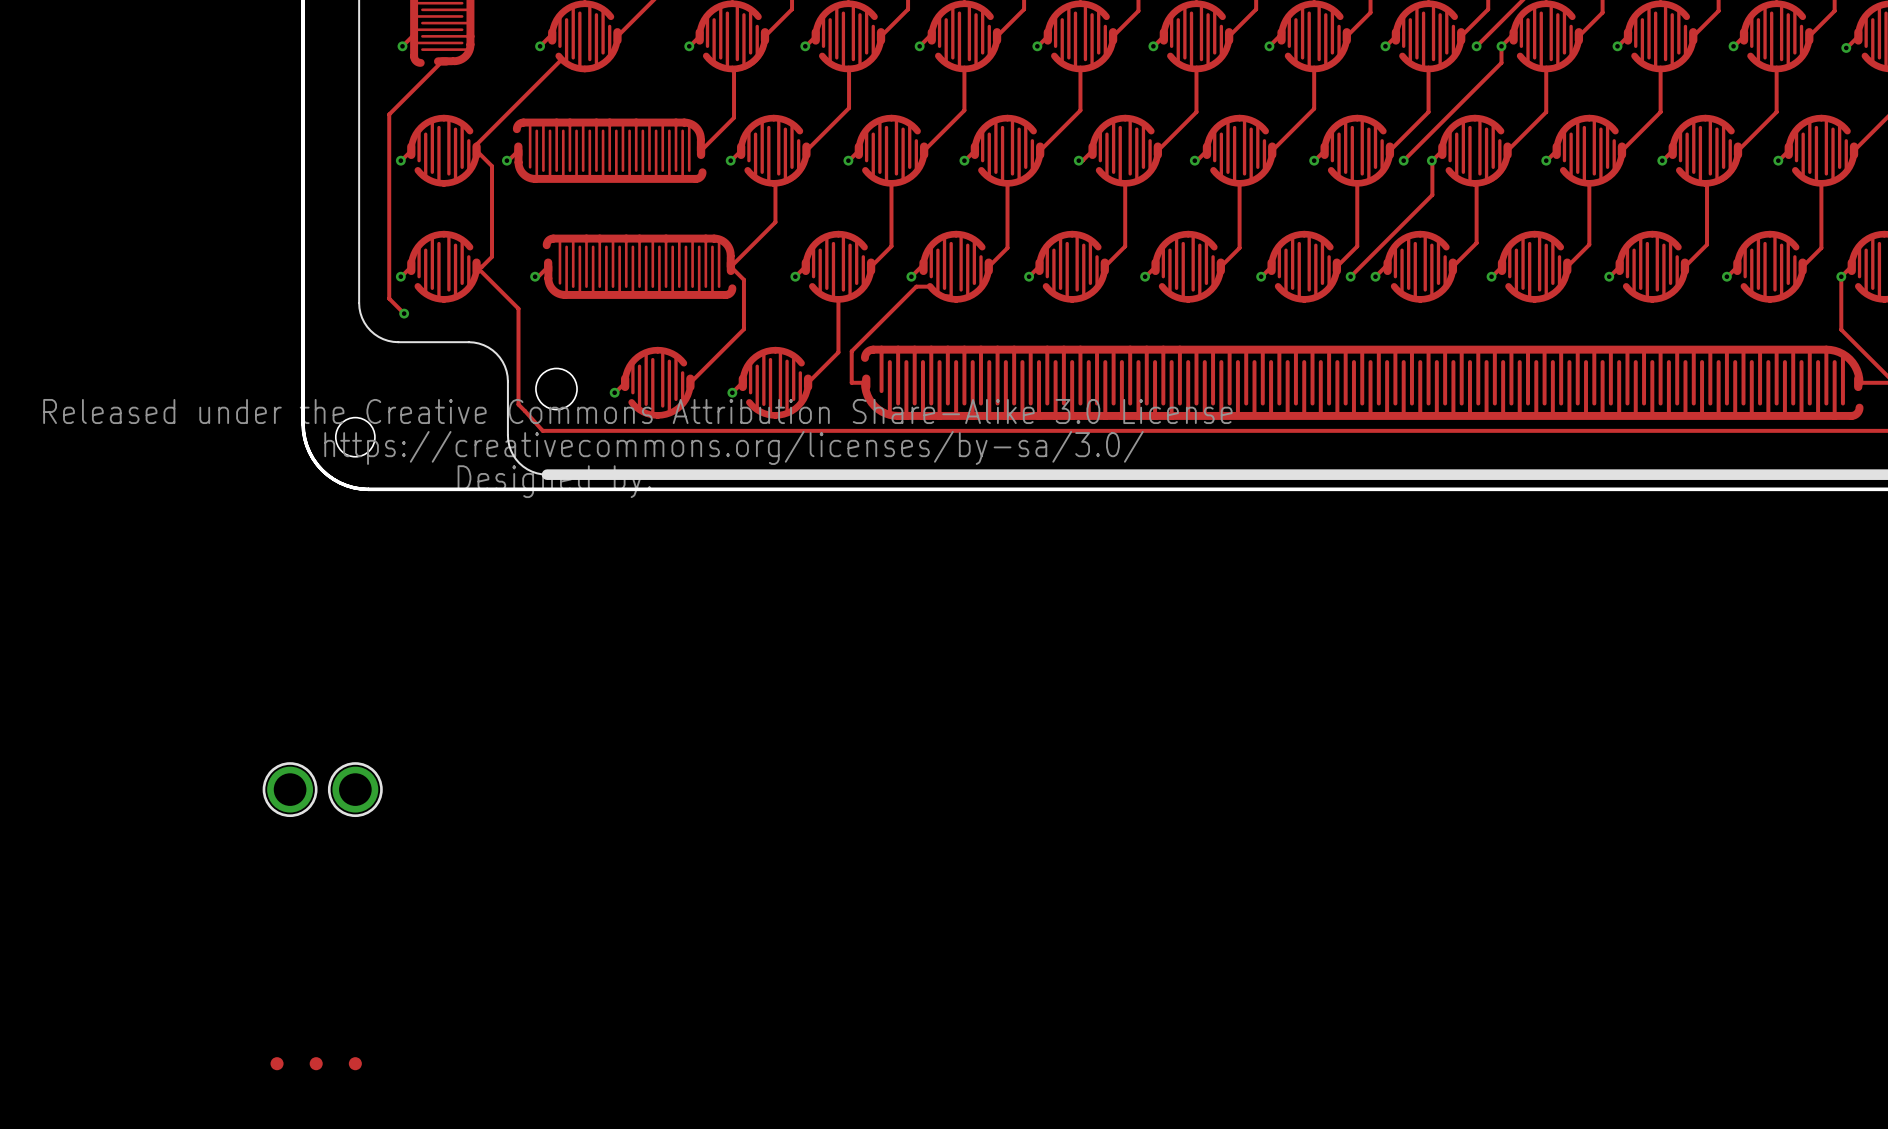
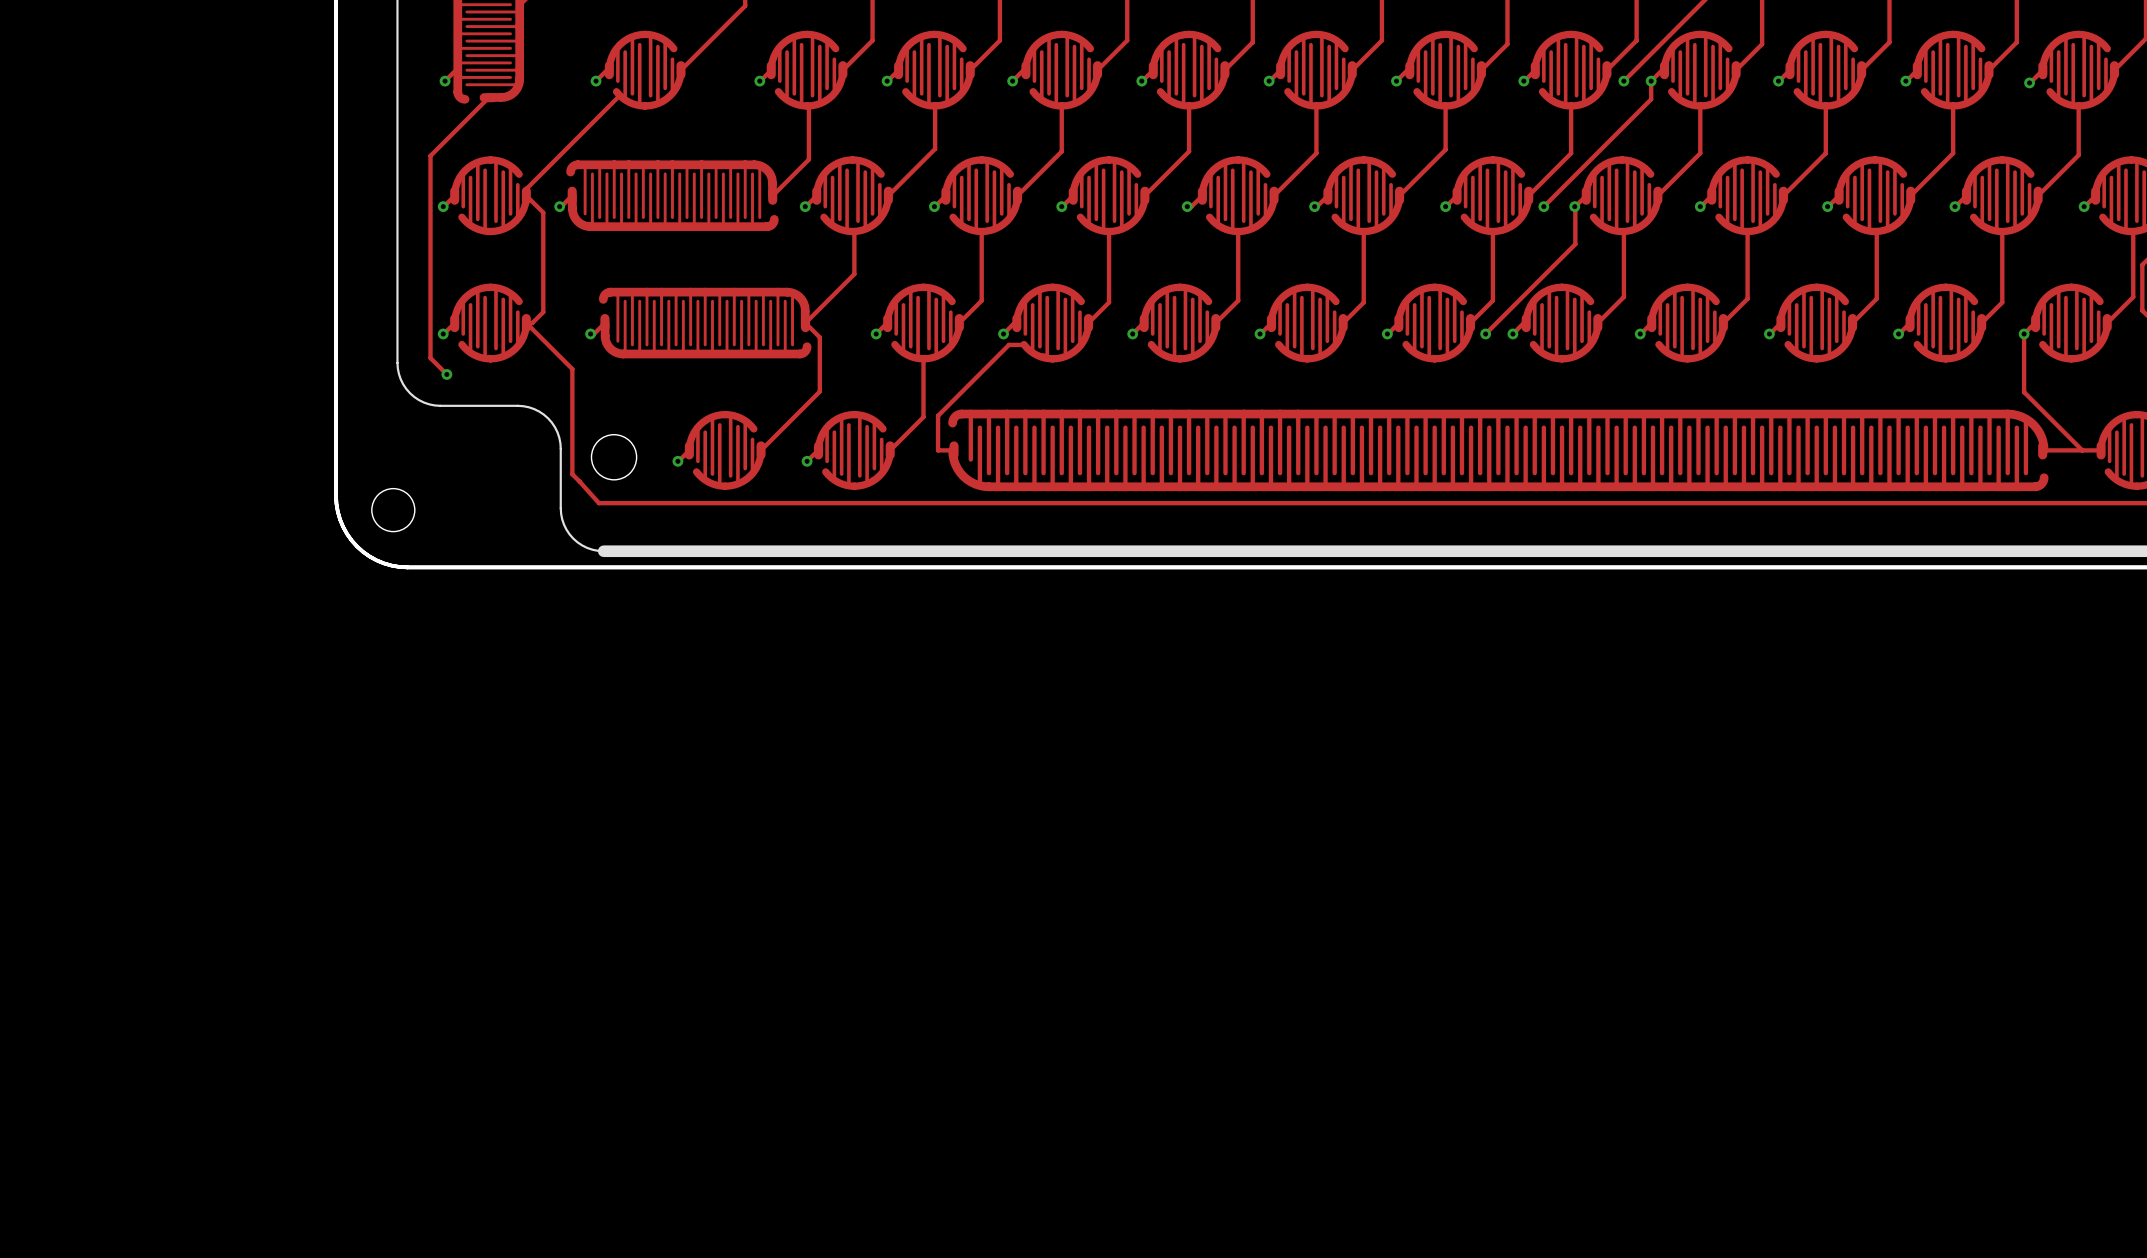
drawing: [43, 398, 1233, 499] -> none
part: (290, 789) -> none
part: (355, 789) -> none
part: (277, 1063) -> none
part: (316, 1063) -> none
part: (355, 1063) -> none

